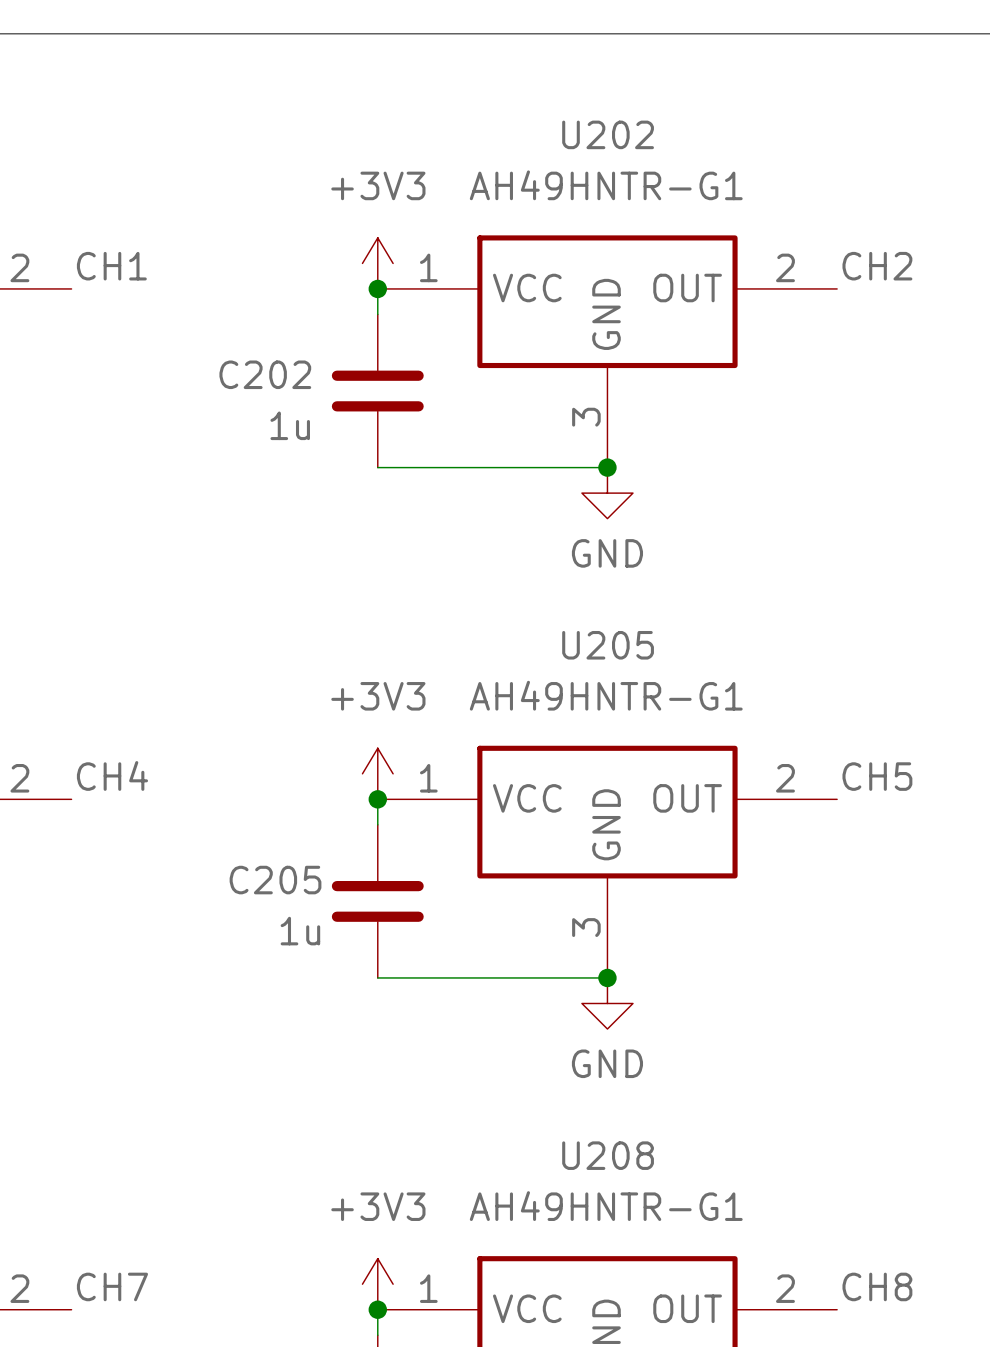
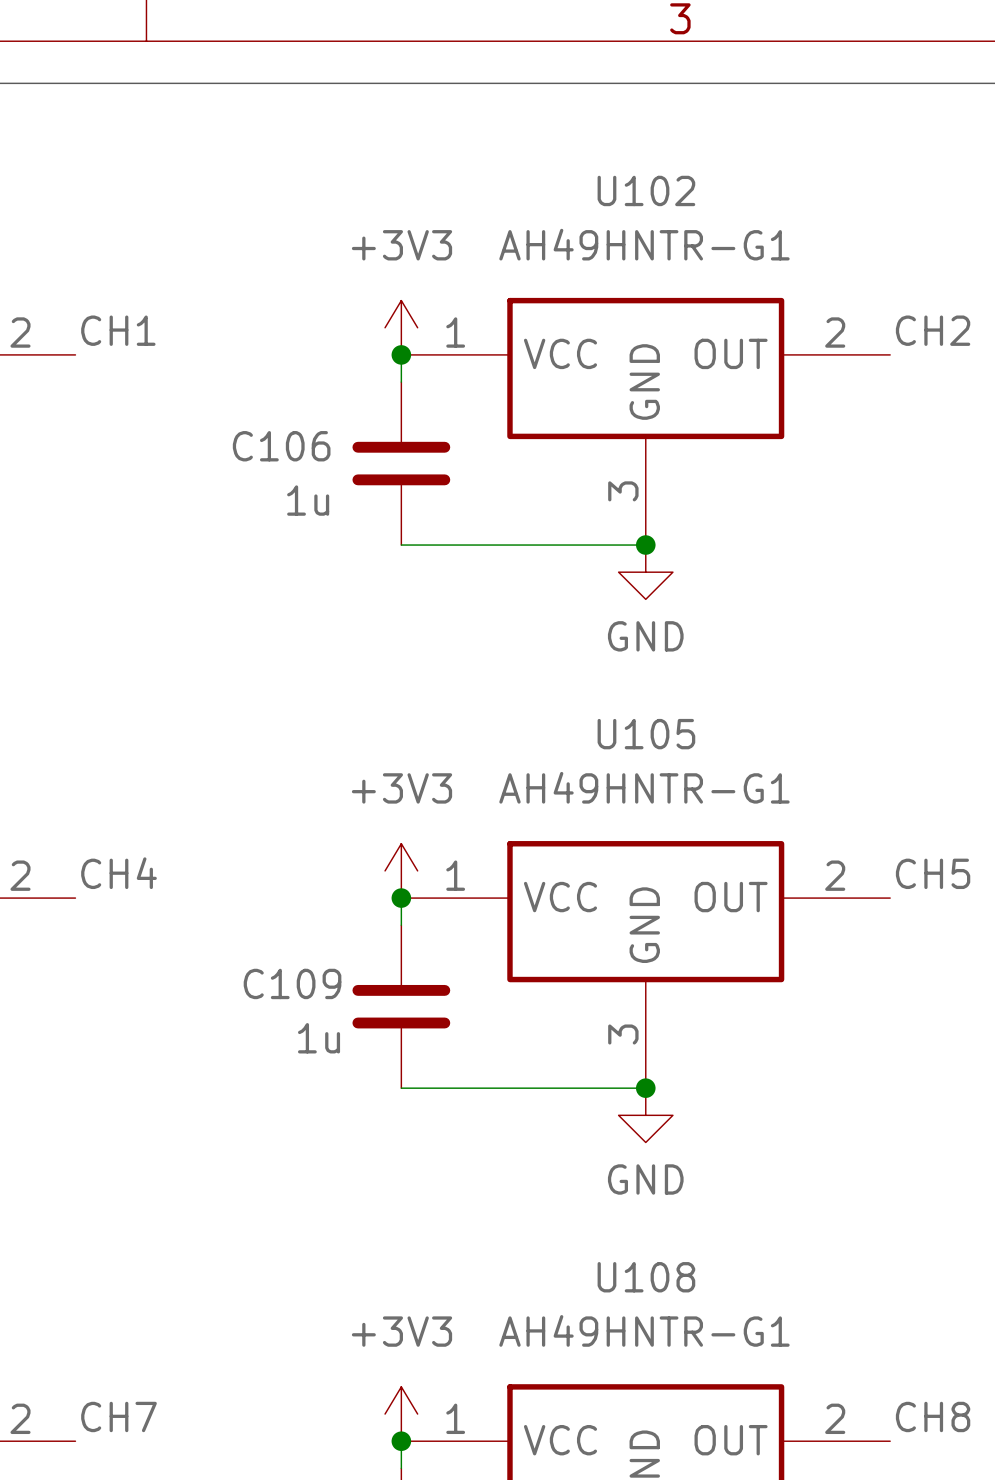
U202 name: U202 (608, 134) -> U102 (646, 190)
C202 name: C202 (265, 374) -> C106 (281, 446)
U205 name: U205 (608, 645) -> U105 (646, 734)
C205 name: C205 (275, 880) -> C109 (292, 983)
U208 name: U208 (608, 1155) -> U108 (646, 1277)

